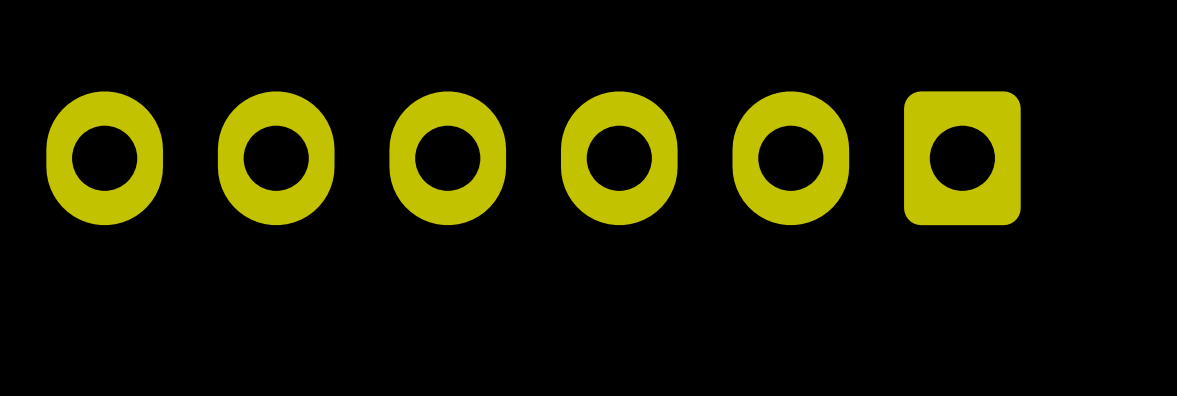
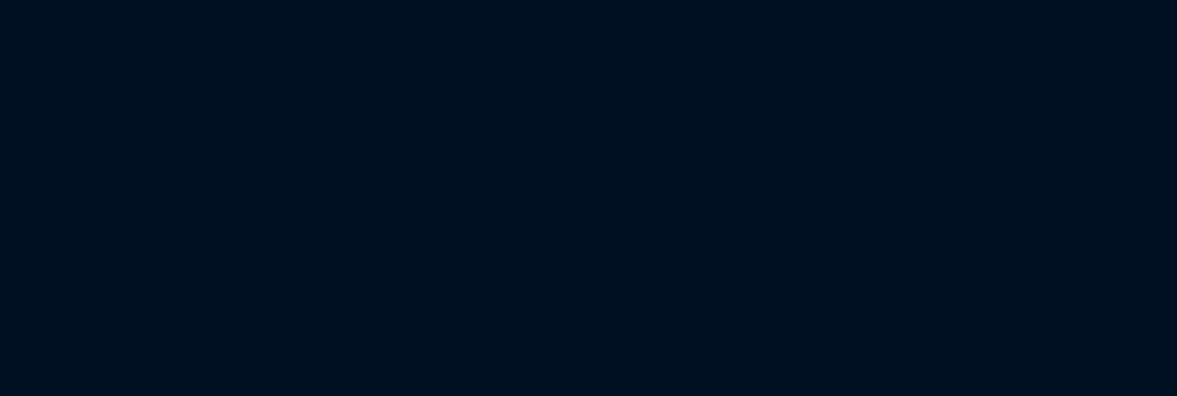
part: (533, 158) -> none

